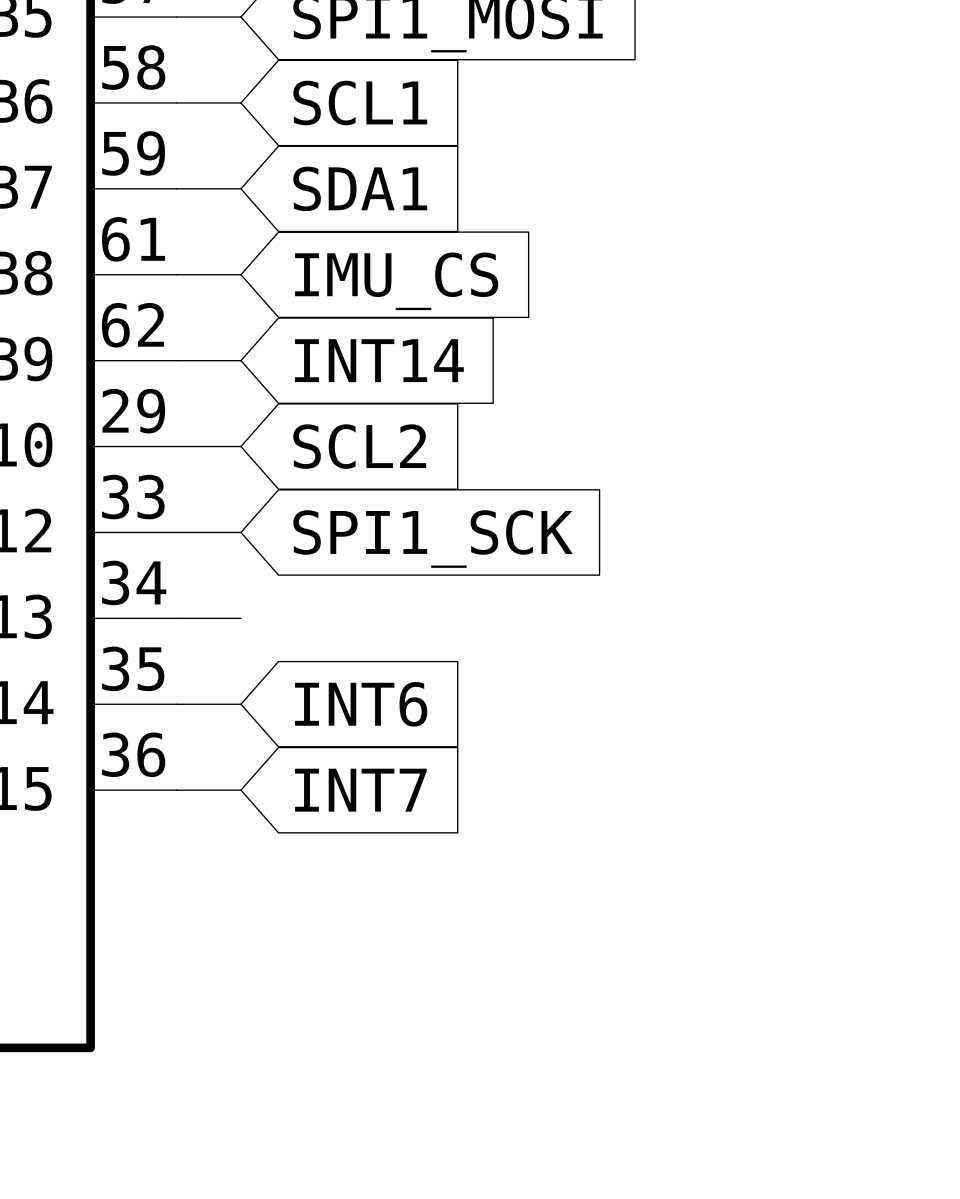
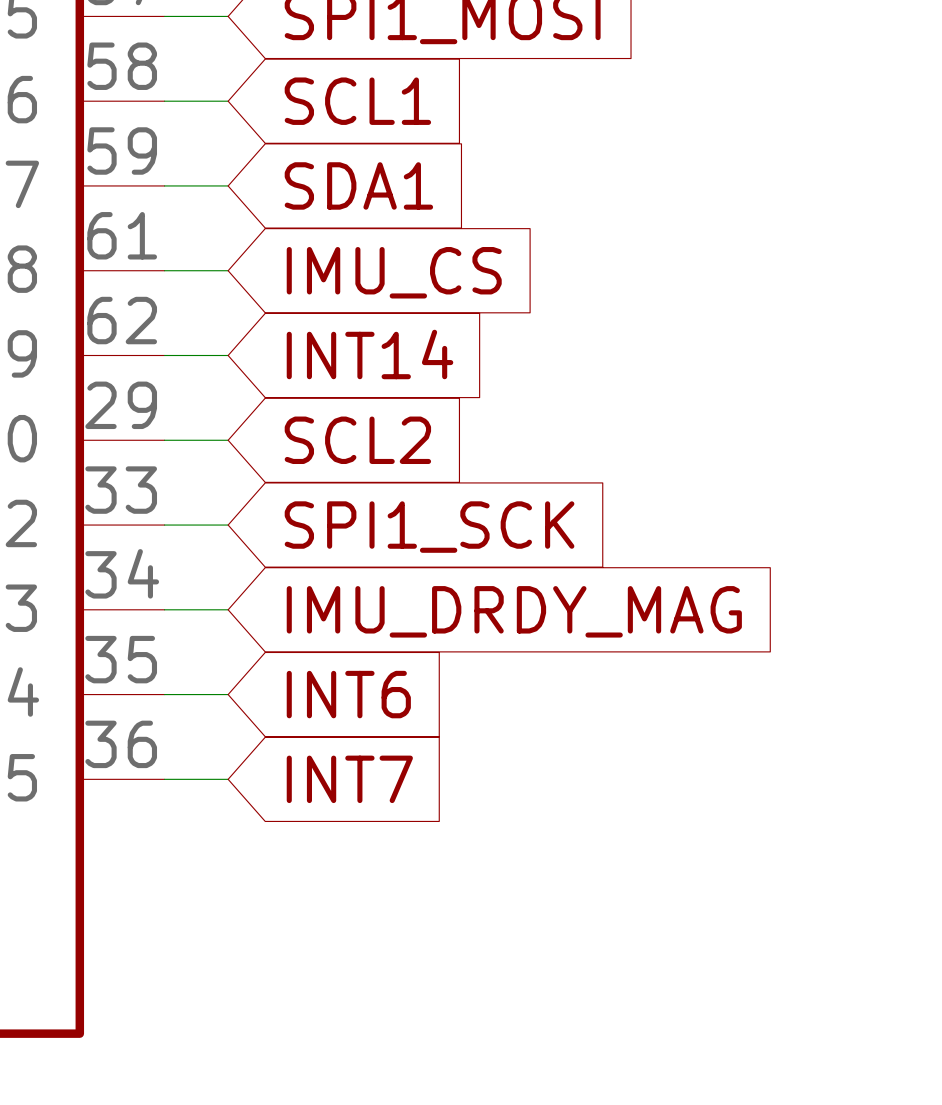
global label: none -> IMU_DRDY_MAG (514, 611)

